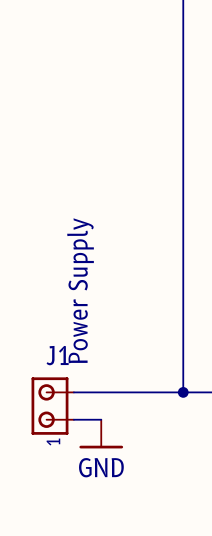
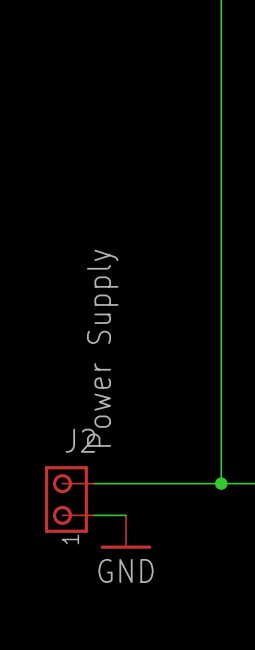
J1 name: J1 (57, 355) -> J2 (80, 440)

